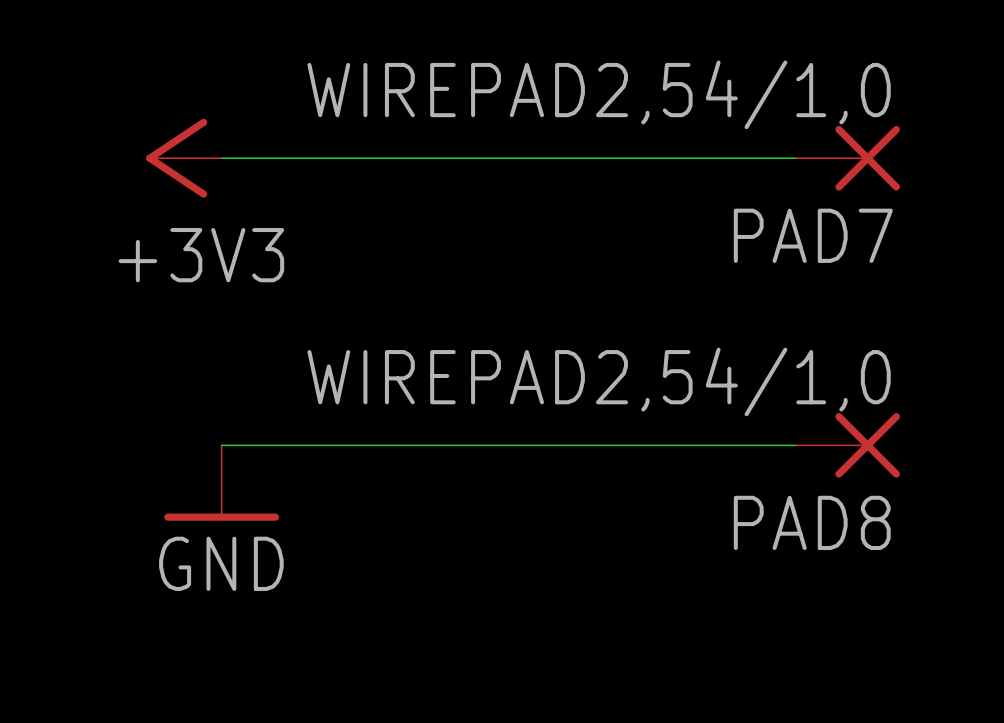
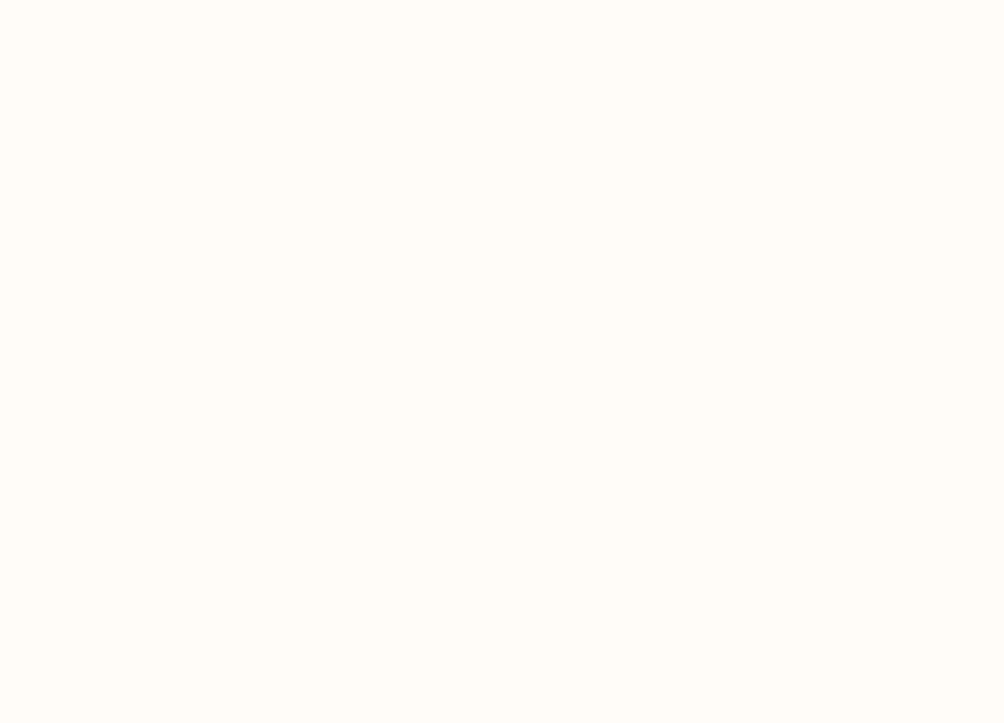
power symbol: +3V3 (183, 158) -> none
wire: (221, 158) (795, 158) -> none
PAD7: WIREPAD2,54/1,0 (847, 158) -> none
wire: (221, 445) (795, 445) -> none
PAD8: WIREPAD2,54/1,0 (847, 445) -> none
power symbol: GND (221, 483) -> none

